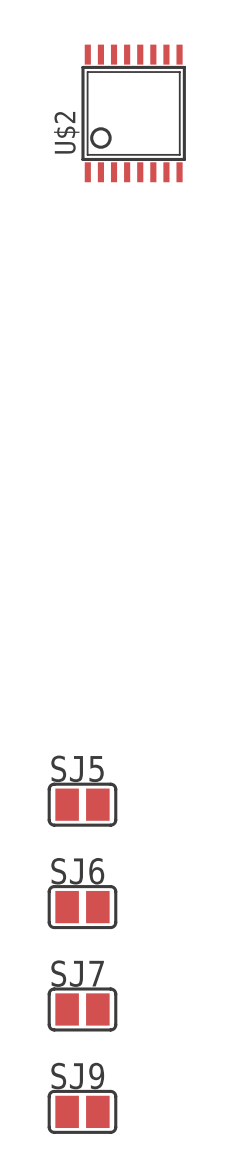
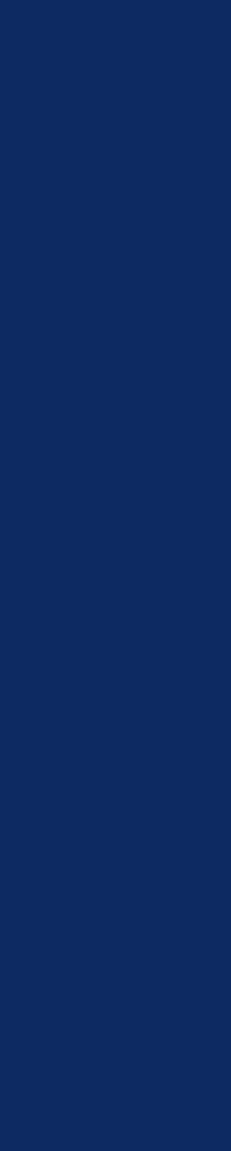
U$2: (133, 113) -> none
SJ5: (82, 804) -> none
SJ6: (82, 907) -> none
SJ7: (82, 1009) -> none
SJ9: (82, 1111) -> none

